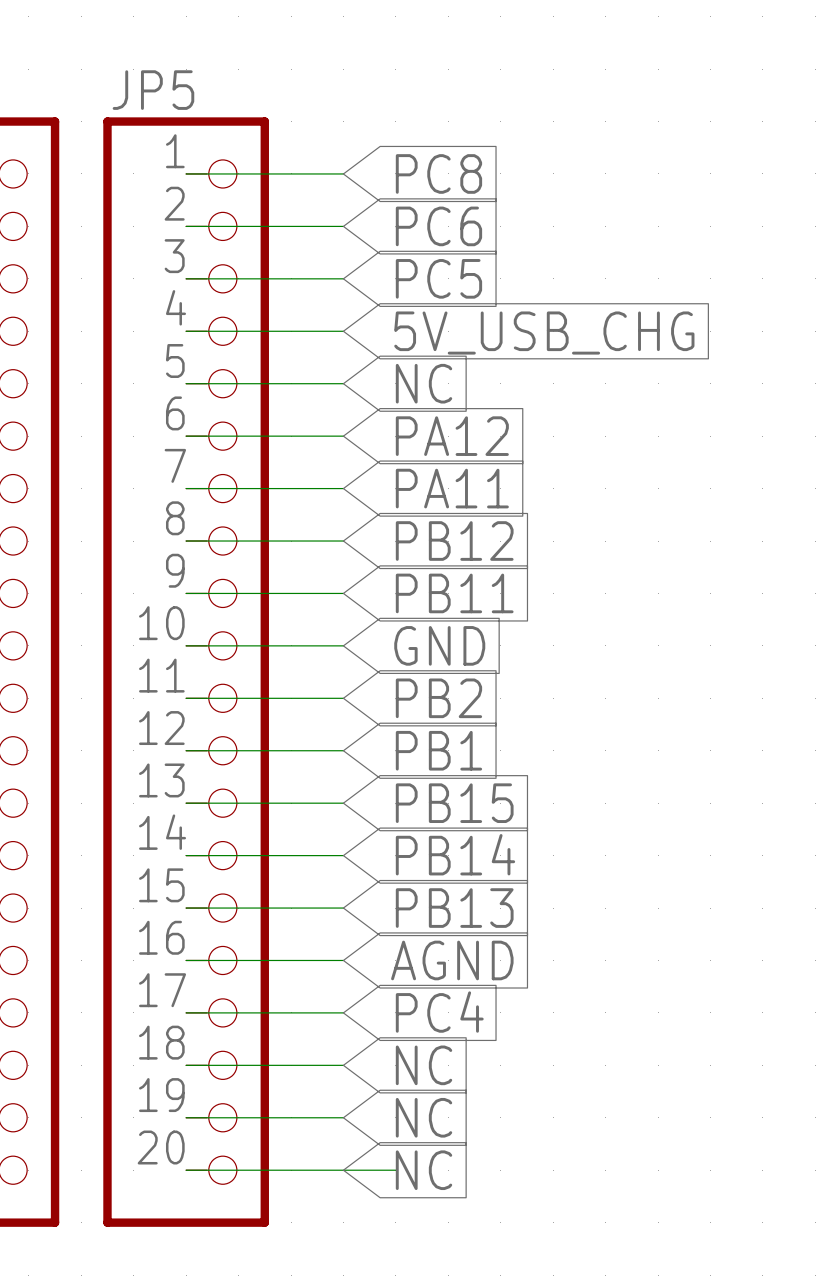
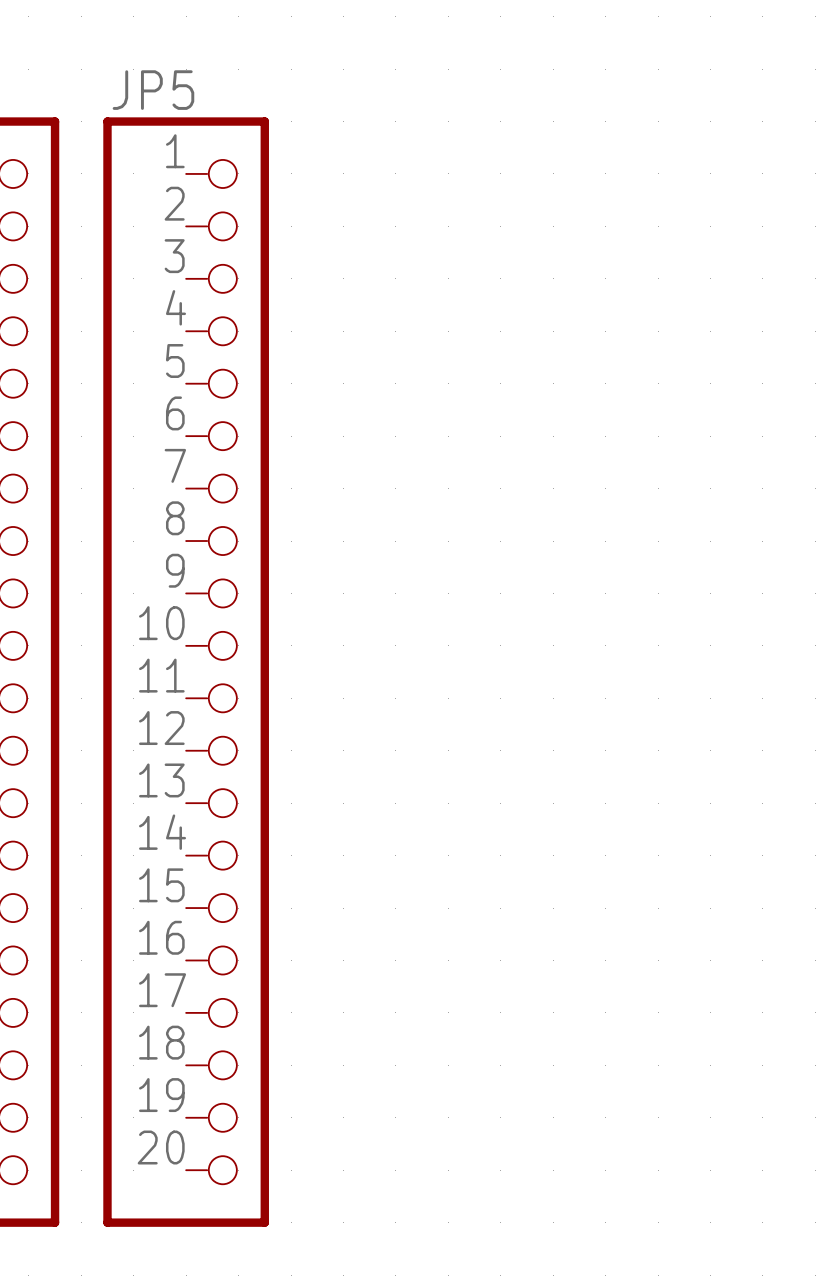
wire: (186, 173) (343, 173) -> none
global label: PC8 (438, 173) -> none
wire: (186, 226) (343, 226) -> none
global label: PC6 (438, 226) -> none
wire: (186, 278) (343, 278) -> none
global label: PC5 (438, 278) -> none
wire: (186, 331) (343, 331) -> none
global label: 5V_USB_CHG (544, 333) -> none
wire: (186, 383) (343, 383) -> none
global label: NC (424, 383) -> none
wire: (186, 436) (343, 436) -> none
global label: PA12 (452, 436) -> none
wire: (186, 488) (343, 488) -> none
global label: PA11 (452, 488) -> none
wire: (186, 541) (343, 541) -> none
global label: PB12 (454, 541) -> none
wire: (186, 593) (343, 593) -> none
global label: PB11 (454, 593) -> none
wire: (186, 645) (343, 645) -> none
global label: GND (439, 645) -> none
wire: (186, 698) (343, 698) -> none
global label: PB2 (438, 698) -> none
wire: (186, 750) (343, 750) -> none
global label: PB1 (438, 750) -> none
wire: (186, 803) (343, 803) -> none
global label: PB15 (454, 803) -> none
global label: PB14 (455, 854) -> none
wire: (186, 855) (343, 855) -> none
wire: (186, 908) (343, 908) -> none
global label: PB13 (454, 908) -> none
wire: (186, 960) (343, 960) -> none
global label: AGND (452, 960) -> none
wire: (186, 1012) (343, 1012) -> none
global label: PC4 (439, 1012) -> none
wire: (186, 1065) (343, 1065) -> none
global label: NC (424, 1065) -> none
wire: (186, 1117) (343, 1117) -> none
global label: NC (424, 1117) -> none
wire: (186, 1170) (395, 1170) -> none
global label: NC (424, 1170) -> none

